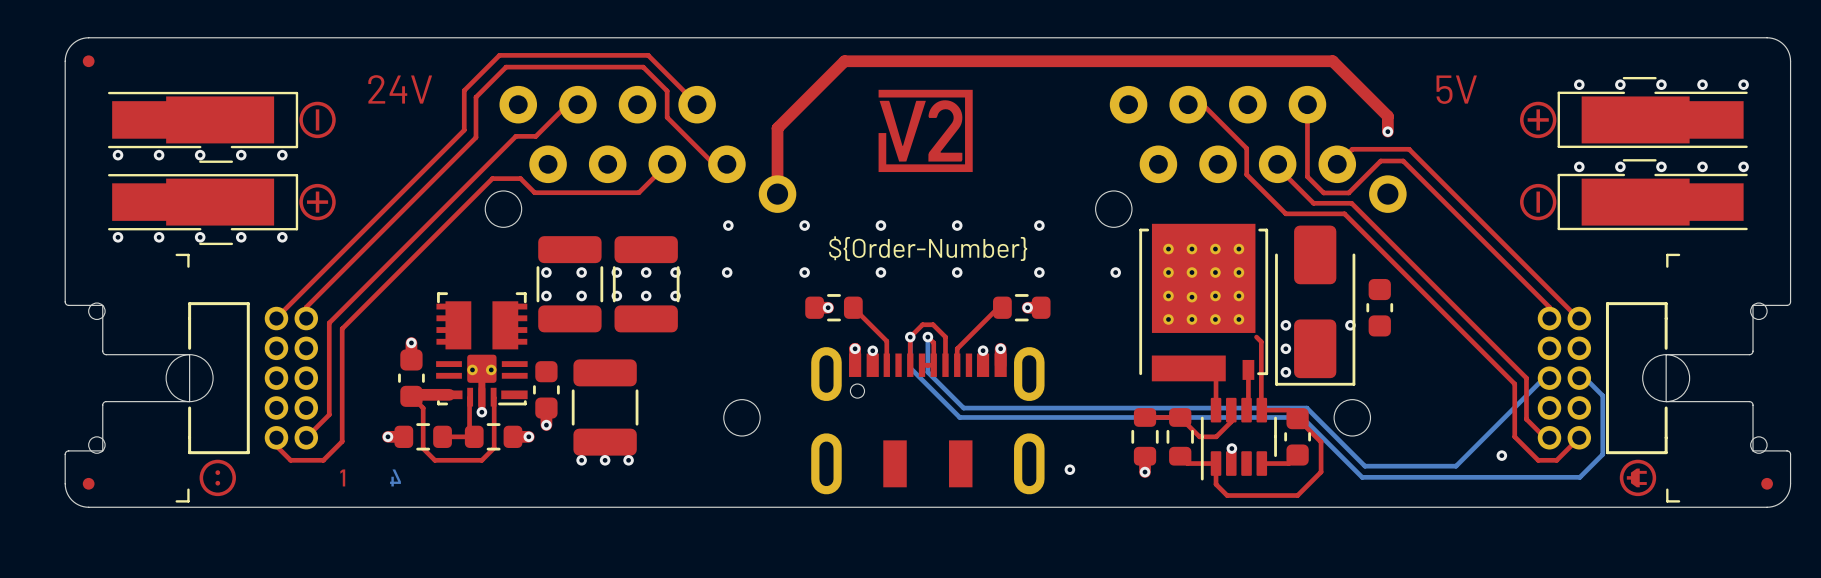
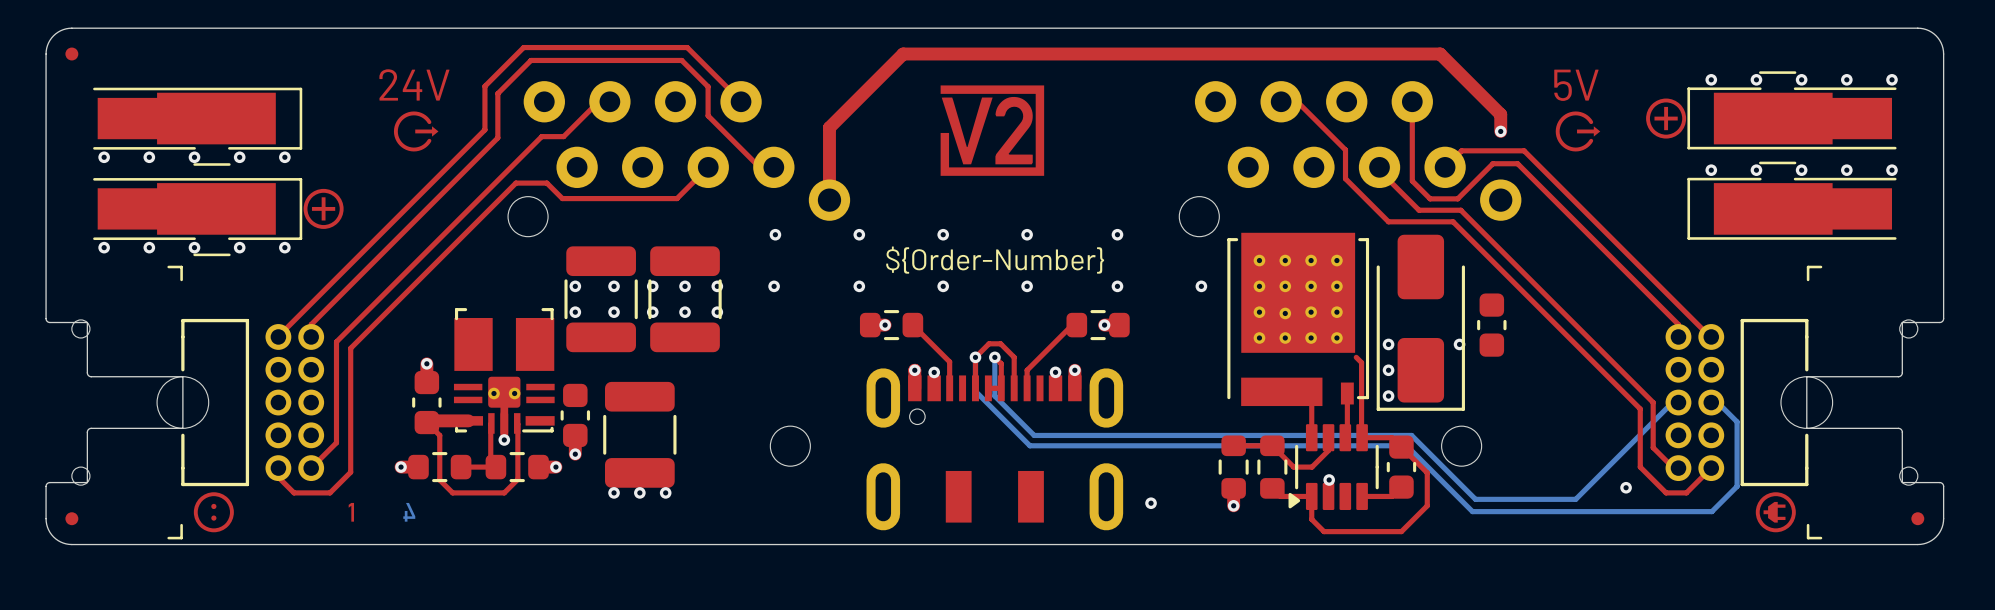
drawing: [299, 101, 336, 139] -> none
drawing: none -> [393, 111, 439, 152]
drawing: none -> [1555, 111, 1601, 152]
drawing: [1520, 183, 1557, 221] -> none
part footprint: [436, 292, 528, 407] -> [453, 308, 555, 434]
part footprint: [1200, 397, 1277, 481] -> [1288, 424, 1379, 511]

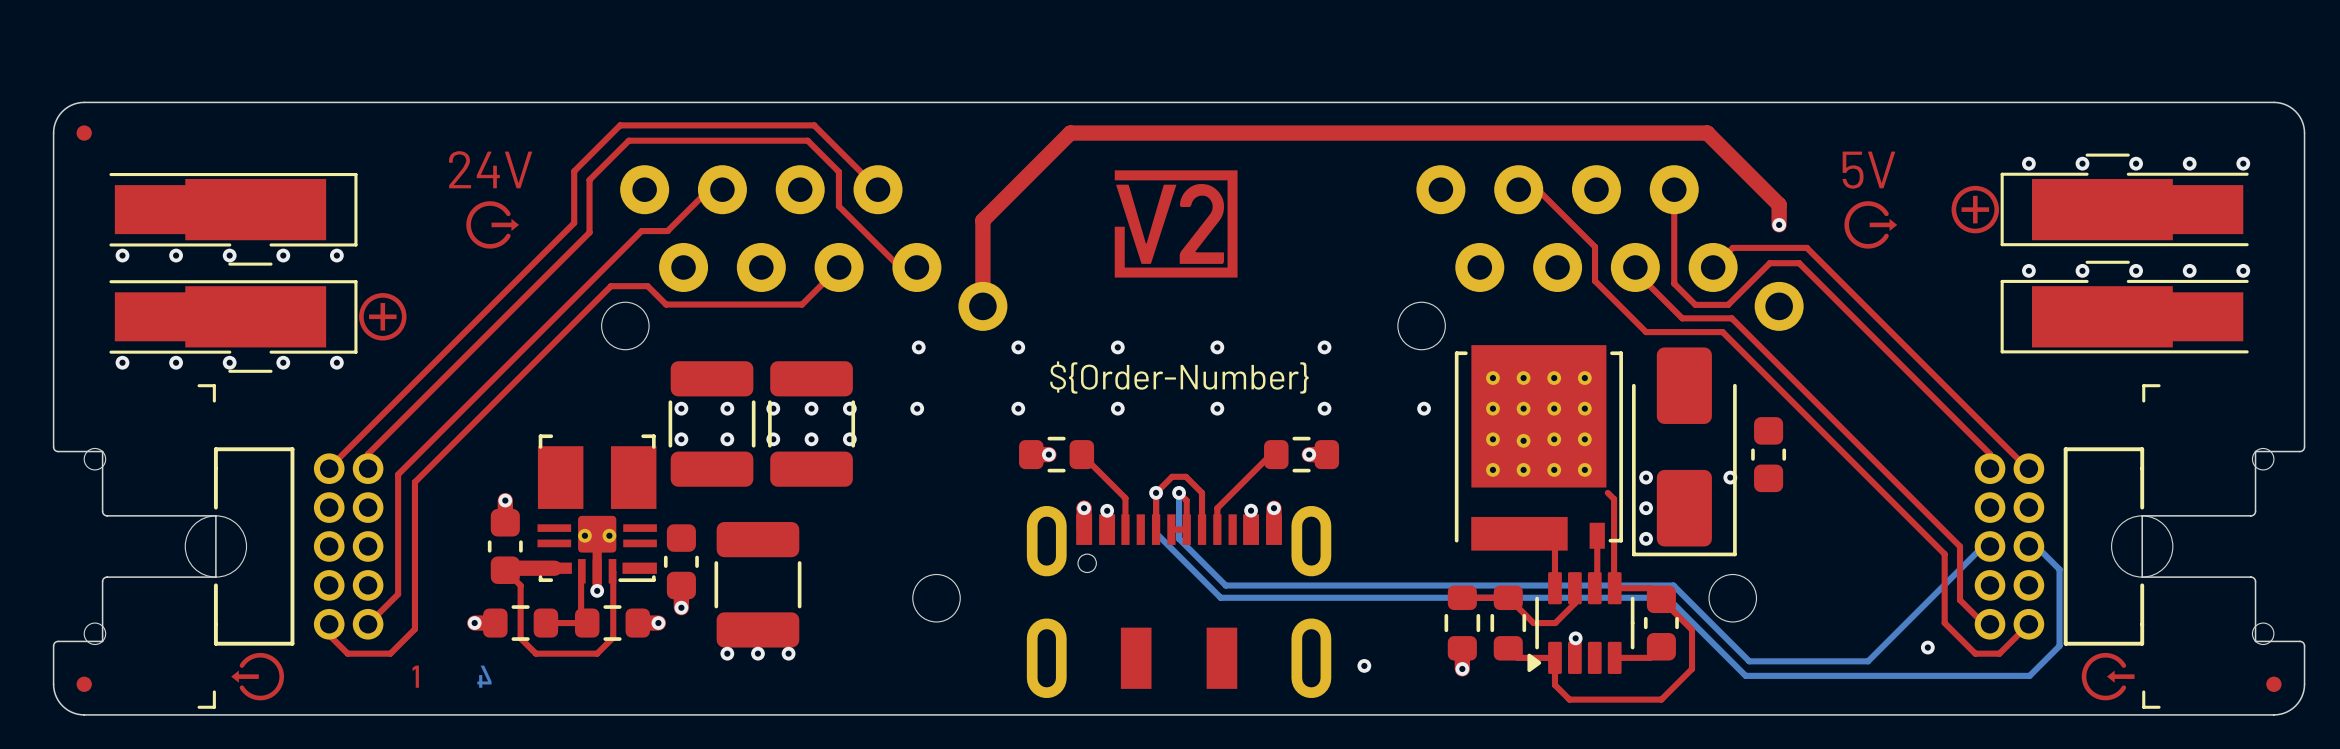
drawing shape: [193, 492, 234, 533] -> [231, 652, 285, 701]
drawing shape: [1755, 492, 1796, 533] -> [2081, 652, 2135, 701]

